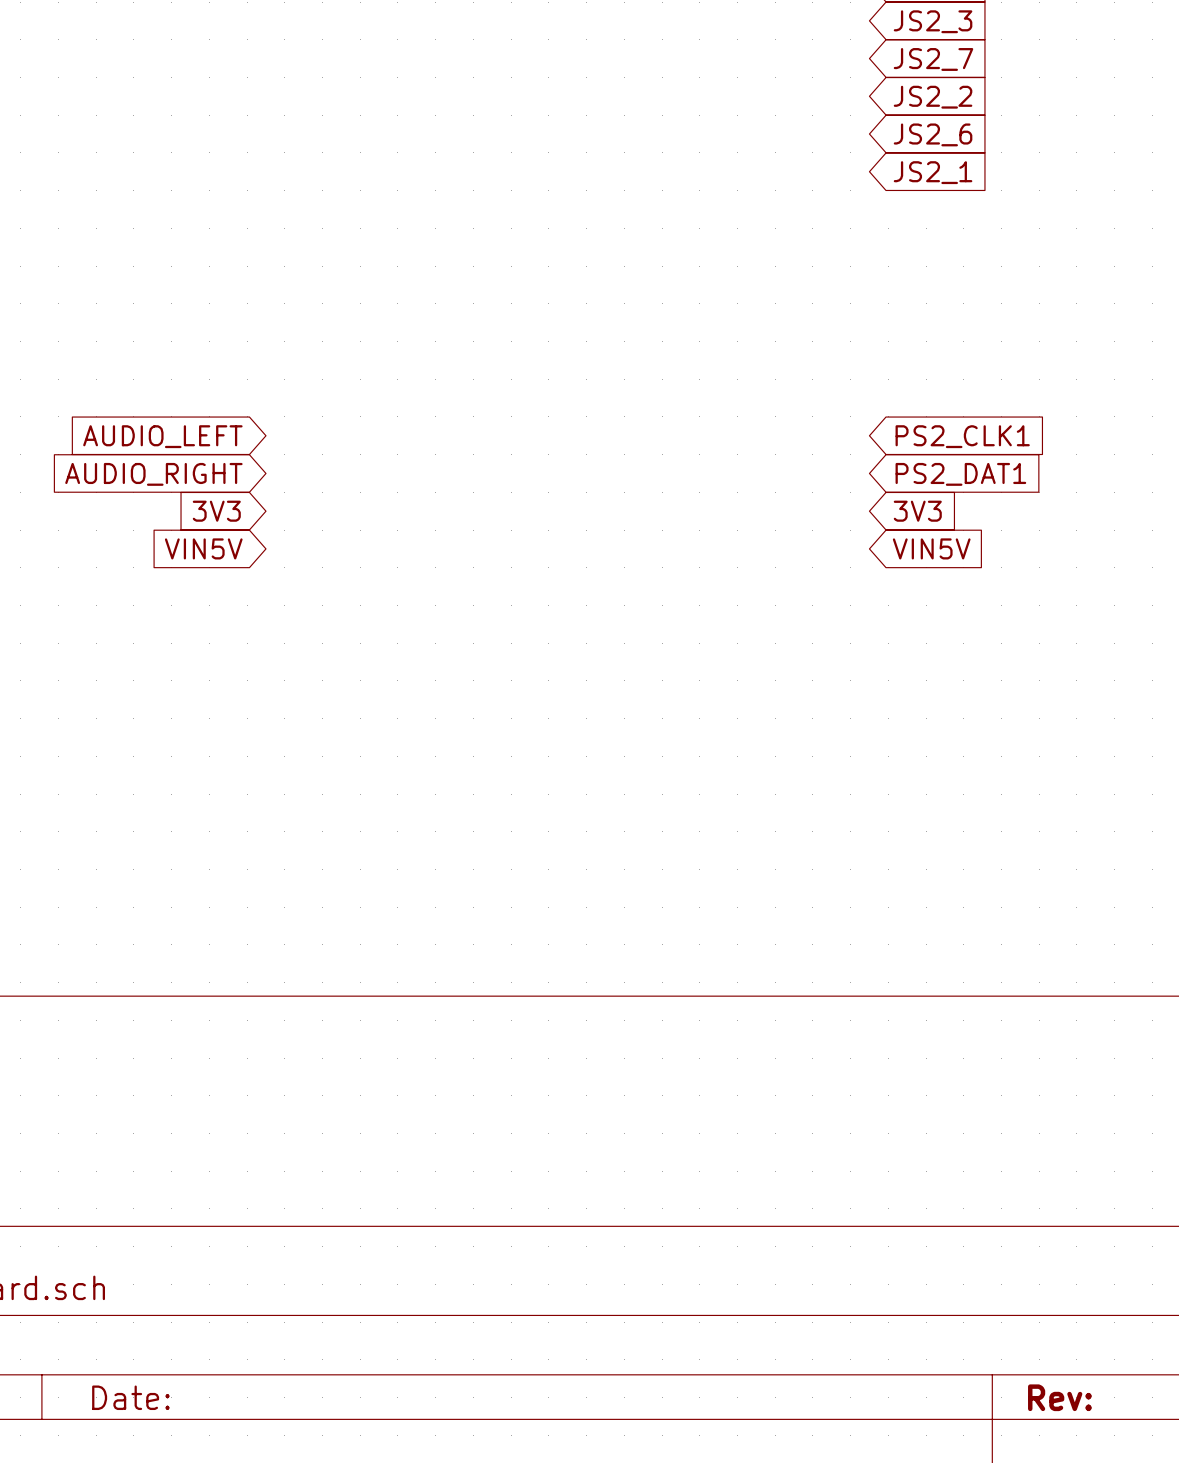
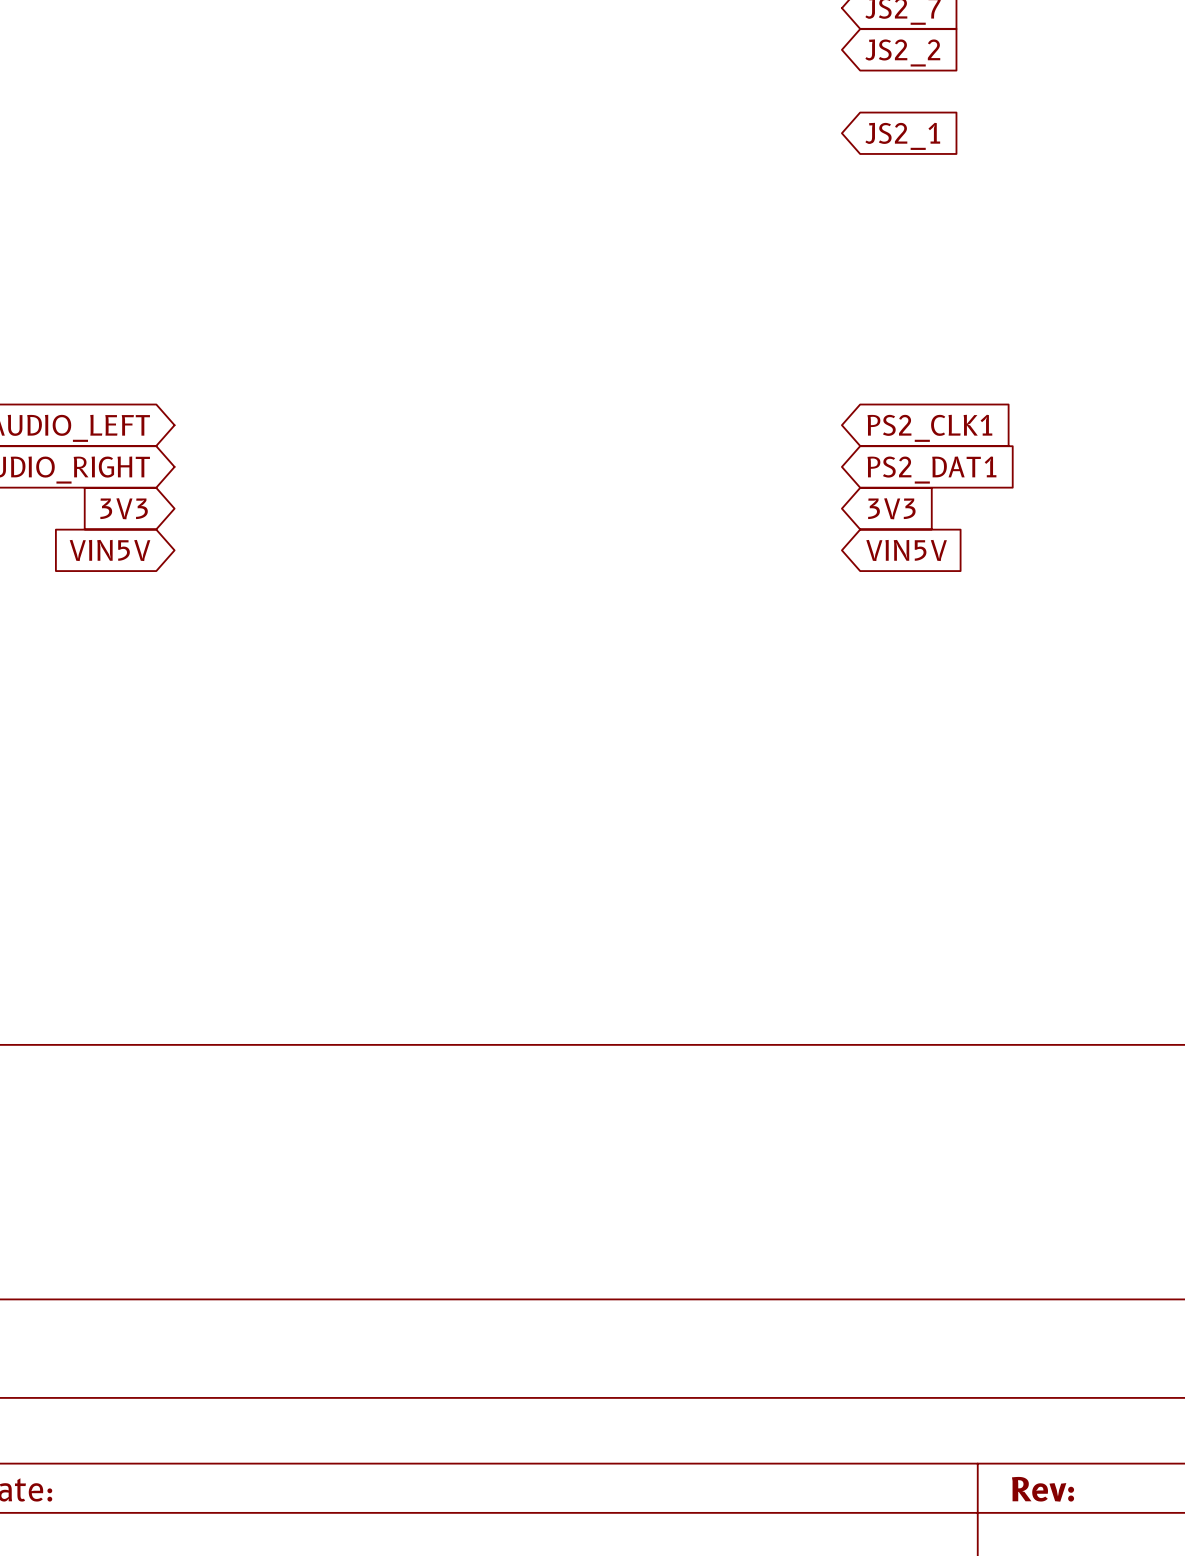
global label: JS2_6 (933, 134) -> none

